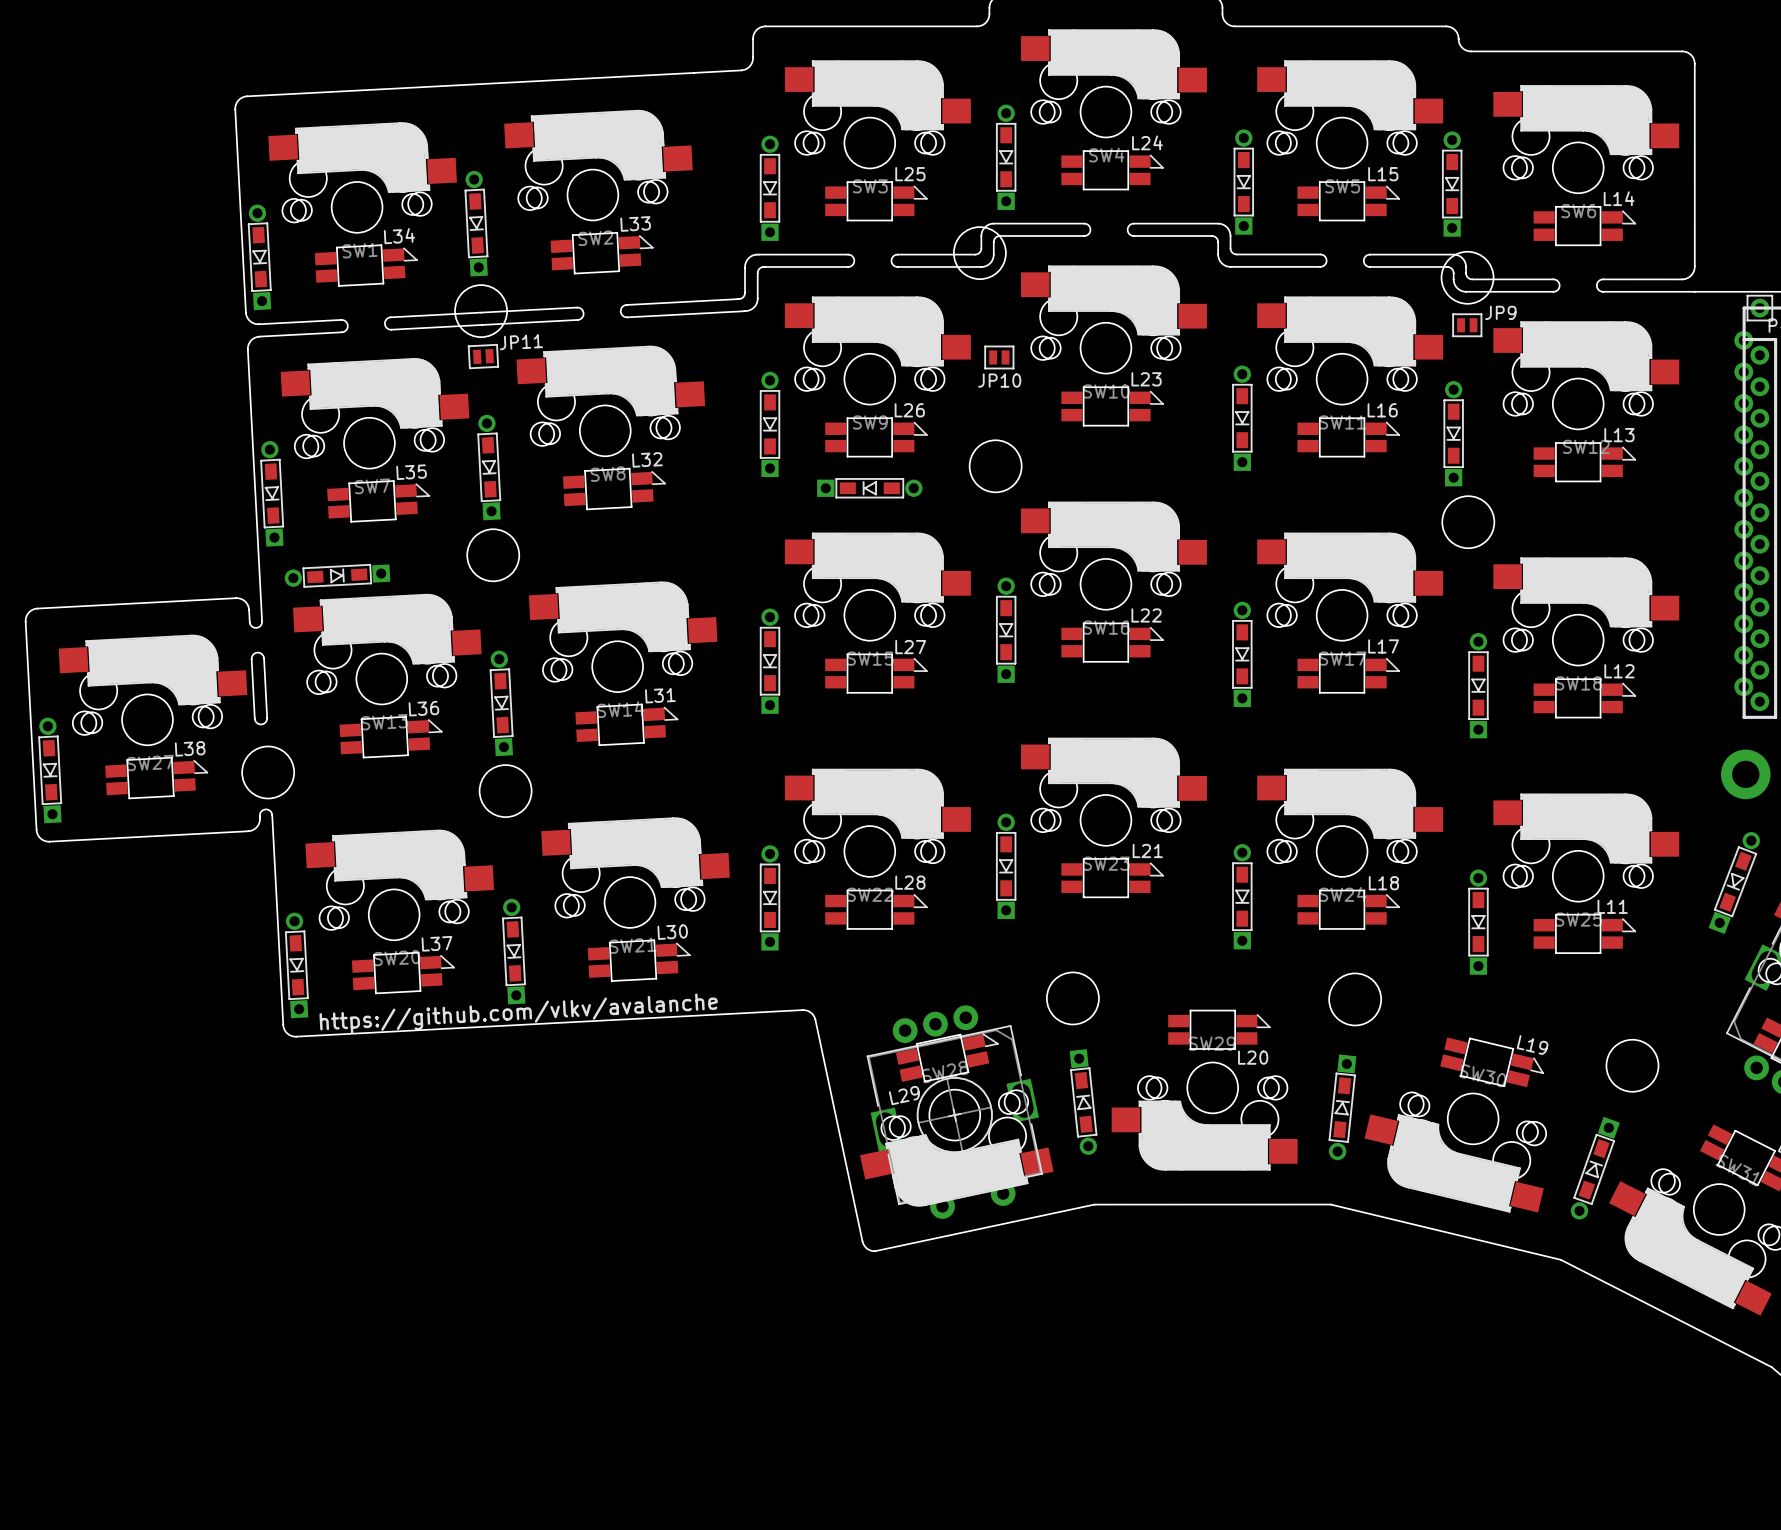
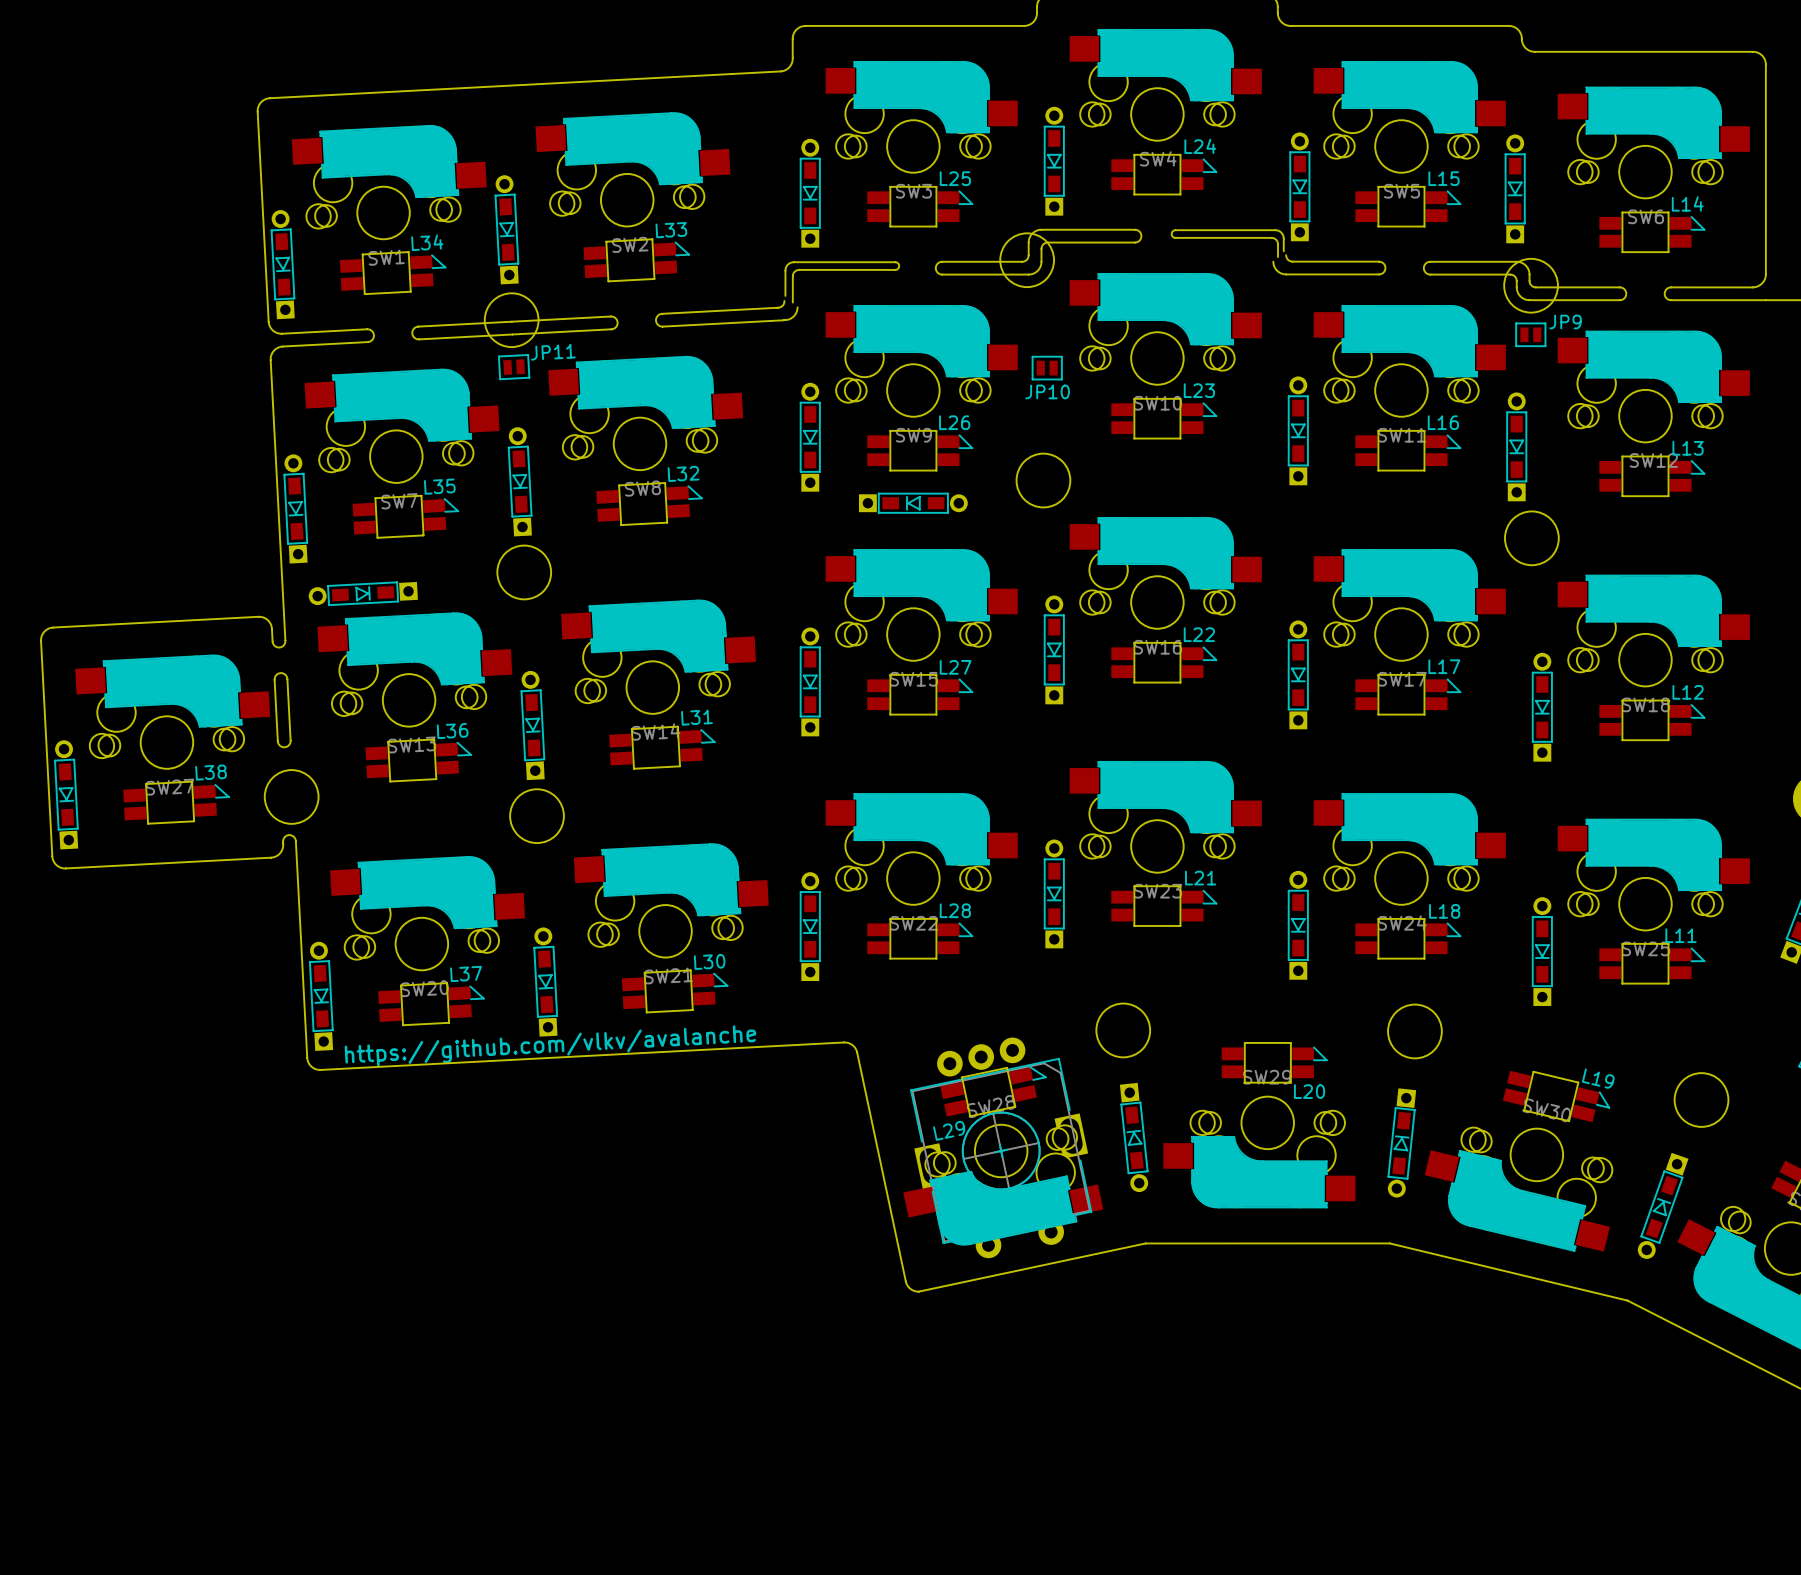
board edge: none -> (1283, 251) (1283, 235) (1276, 230) (1175, 230) (1171, 233) (1172, 236) (1175, 237) (1273, 238) (1277, 242) (1278, 256)
board edge: (1230, 248) (1229, 231) (1225, 226) (1219, 223) (1133, 223) (1127, 228) (1128, 232) (1133, 235) (1213, 236) (1217, 240) (1218, 254) -> none
board edge: none -> (785, 295) (785, 269) (791, 262) (895, 262) (898, 264) (898, 268) (895, 269) (796, 270) (792, 275) (792, 302)
board edge: (745, 292) (745, 264) (747, 259) (753, 255) (848, 254) (853, 258) (853, 263) (848, 266) (761, 267) (757, 272) (757, 298) -> none

